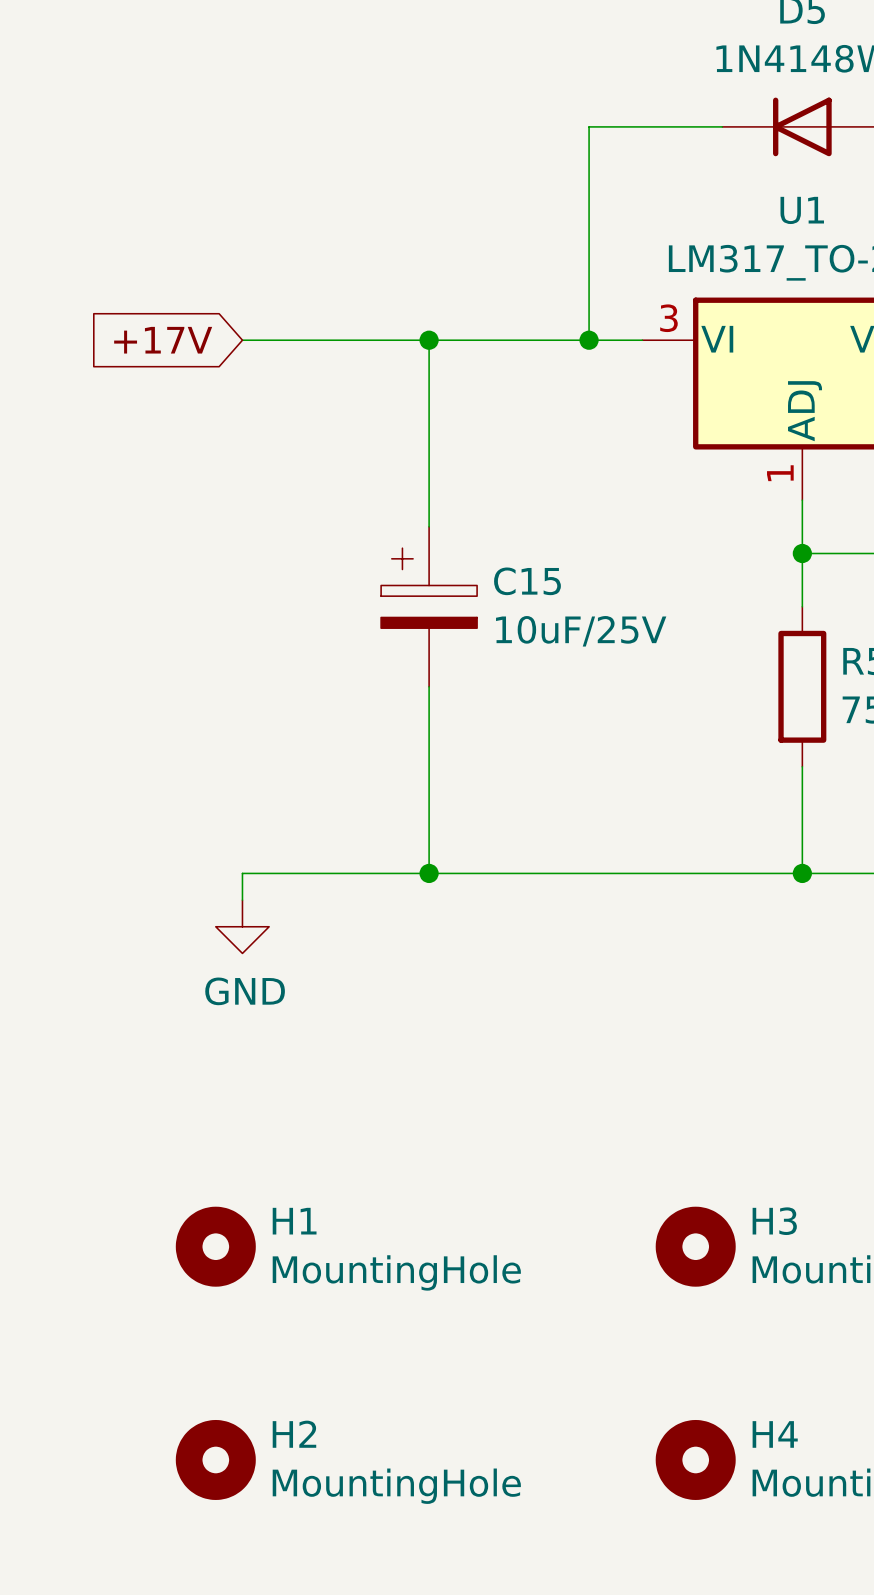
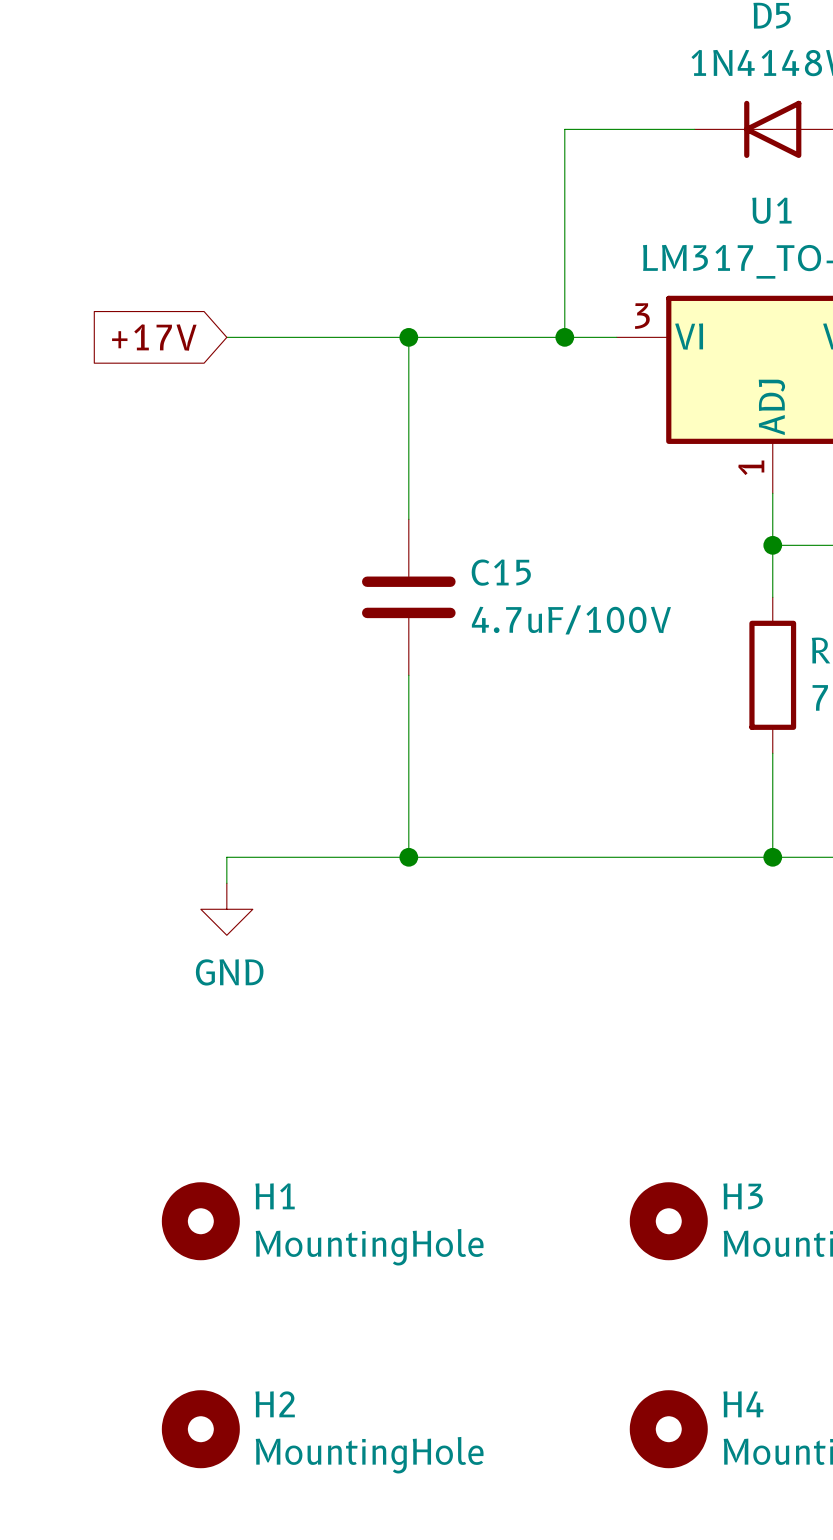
C15 symbol: [381, 526, 478, 687] -> [362, 519, 456, 676]
C15 value: 10uF/25V (581, 631) -> 4.7uF/100V (571, 619)

